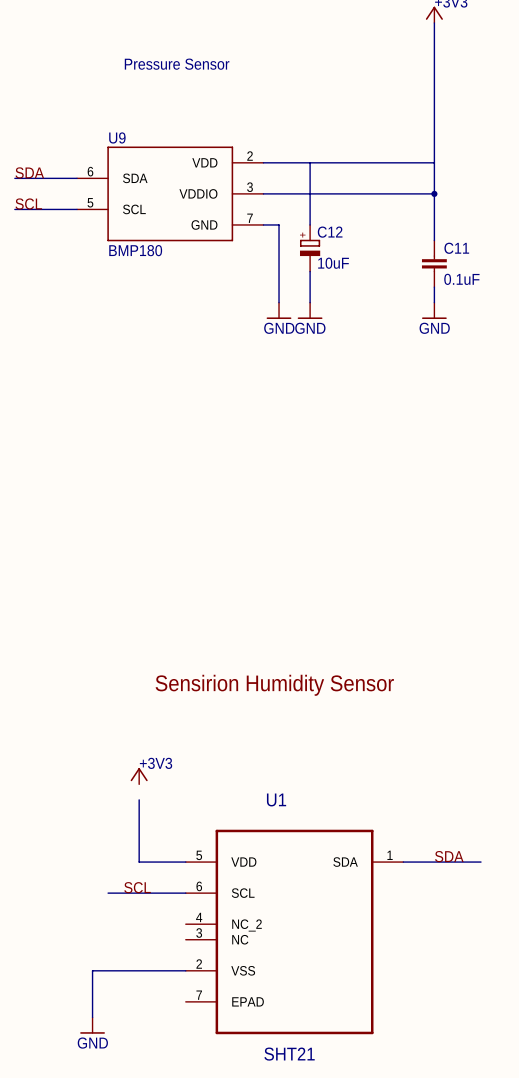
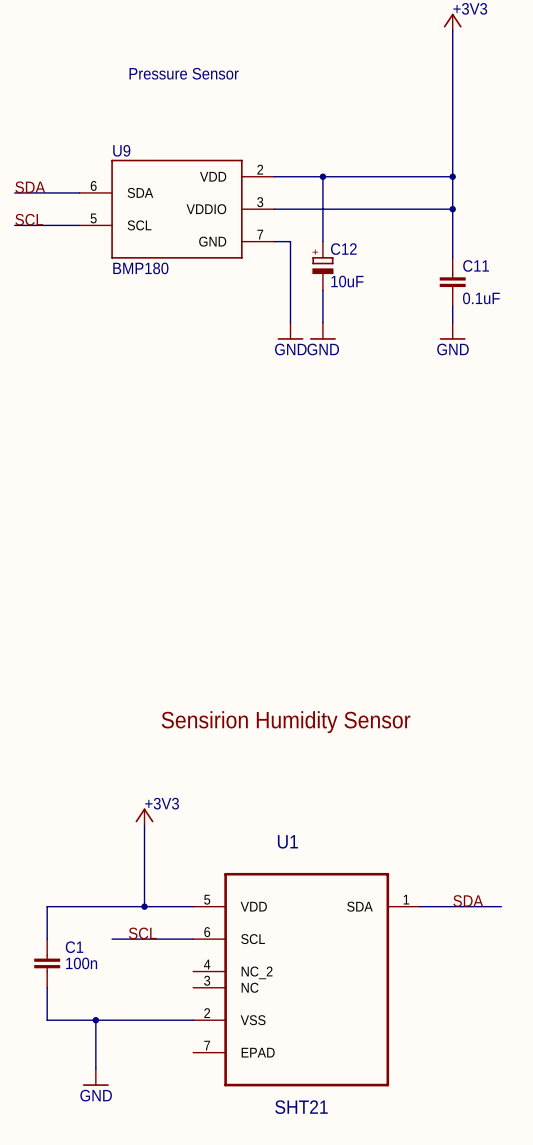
junction: none -> (322, 176)
junction: none -> (452, 176)
wire: none -> (144, 825) (144, 841)
wire: none -> (144, 906) (47, 906) (47, 939)
junction: none -> (144, 906)
C1: none -> 100n (47, 963)
wire: none -> (47, 987) (47, 1020) (95, 1020)
junction: none -> (95, 1020)

